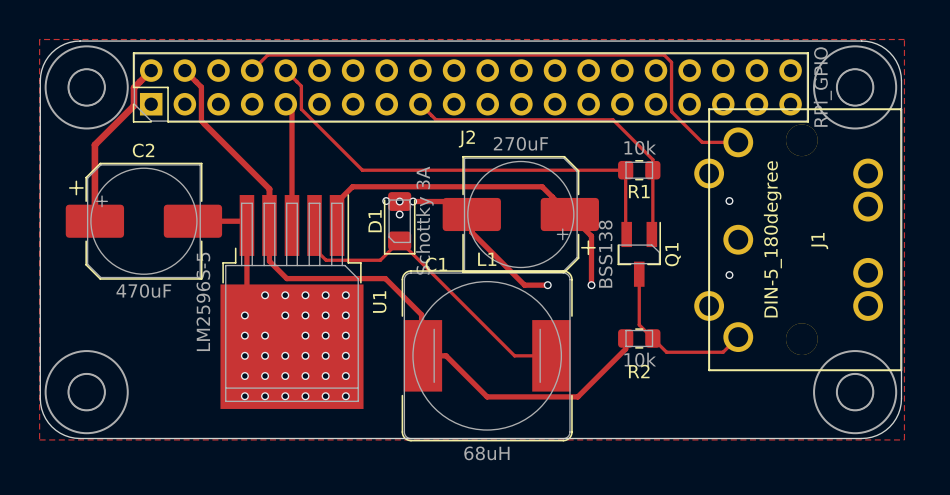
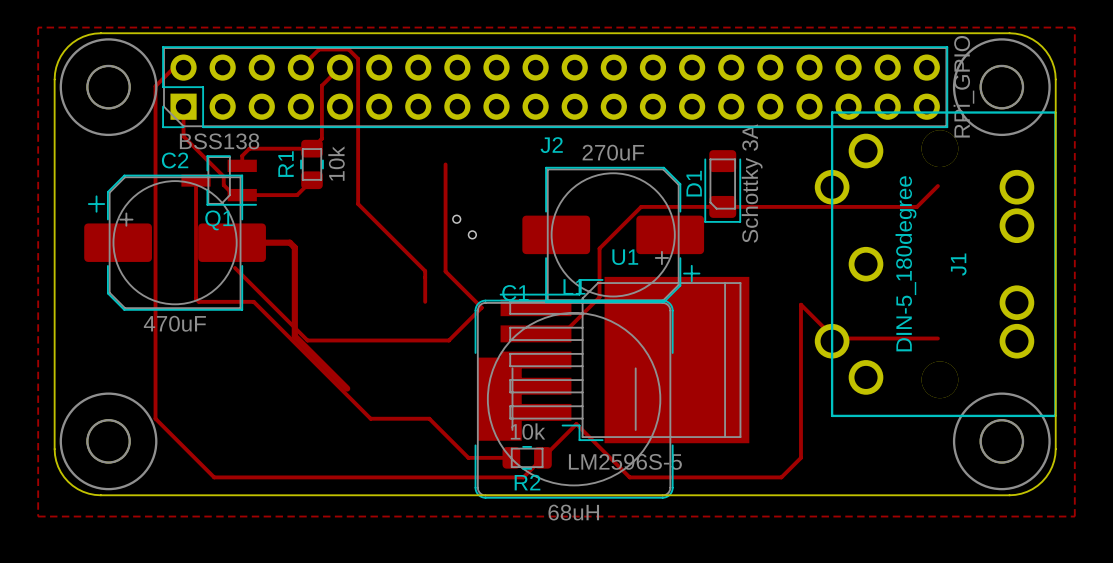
zone outline: (39, 39) (39, 439) (904, 439) (904, 39) (39, 39) -> (38, 27) (38, 516) (1074, 516) (1074, 27) (38, 27)
track: (293, 55) (664, 55) (671, 62) (671, 111) (702, 142) (738, 142) -> none
track: (151, 70) (133, 87) (133, 105) (94, 144) (94, 221) -> (183, 67) (174, 67) (155, 86) (155, 418) (214, 477) (523, 477) (542, 457)
track: (184, 70) (201, 87) (201, 121) (269, 189) (269, 261) (286, 278) (385, 278) (421, 314) (421, 355) (446, 355) (487, 396) (577, 396) (625, 349) (625, 338) -> none
track: (285, 70) (301, 86) -> (348, 49) (358, 58) (358, 85)
track: none -> (340, 67) (321, 85) (321, 138) (311, 148) (249, 148) (242, 155) (242, 165)
track: none -> (183, 106) (183, 136) (223, 176) (223, 185) (233, 195) (297, 195) (311, 180)
track: (285, 104) (291, 110) (291, 225) -> none
track: (420, 104) (435, 119) (613, 119) (652, 159) (651, 234) -> none
track: (301, 109) (362, 170) (625, 170) (626, 234) -> (358, 112) (358, 204) (425, 271) (425, 301)
track: none -> (445, 164) (445, 271) (481, 307) (448, 340) (307, 340) (234, 267)
track: none -> (196, 180) (196, 299) (198, 301) (253, 301) (370, 418) (429, 418) (468, 457) (511, 457)
R1 rotation: 0° (639, 170) -> 90° clockwise (311, 164)
R1 position: (639, 170) -> (311, 164)
track: none -> (937, 186) (917, 206) (641, 206) (599, 248) (599, 297) (562, 333) (536, 333)
track: (399, 201) (458, 201) (471, 214) (471, 232) (524, 285) (547, 285) -> none
via: (399, 201) -> none
via: (413, 201) -> none
via: (729, 201) -> none
D1 position: (399, 223) -> (722, 186)
track: (314, 225) (314, 248) (326, 260) (380, 260) (399, 240) (514, 355) (552, 355) -> none
track: (337, 225) (337, 202) (352, 186) (542, 186) (591, 236) (591, 285) -> none
Q1 rotation: 0° (639, 254) -> 90° clockwise (219, 180)
Q1 position: (639, 254) -> (219, 180)
track: (639, 274) (639, 324) (666, 352) (723, 352) (738, 337) -> none
via: (729, 275) -> none
via: (547, 285) -> none
via: (591, 285) -> none
via: (265, 295) -> none
via: (285, 295) -> none
via: (305, 295) -> none
via: (325, 295) -> none
via: (345, 295) -> none
U1 rotation: 0° (291, 301) -> 90° counterclockwise (624, 360)
U1 position: (291, 301) -> (624, 360)
track: none -> (937, 338) (834, 338) (800, 304) (800, 457) (781, 477) (629, 477) (576, 424) (542, 457)
via: (244, 315) -> none
via: (285, 315) -> none
via: (305, 315) -> none
via: (325, 315) -> none
via: (345, 315) -> none
via: (244, 335) -> none
via: (265, 335) -> none
via: (305, 335) -> none
via: (325, 335) -> none
via: (345, 335) -> none
R2 position: (639, 338) -> (527, 457)
via: (244, 355) -> none
via: (265, 355) -> none
via: (285, 355) -> none
via: (305, 355) -> none
via: (325, 355) -> none
via: (345, 355) -> none
R2 value position: 10k (640, 359) -> 10k (528, 431)
R2 name position: R2 (639, 371) -> R2 (527, 482)
via: (244, 376) -> none
via: (265, 376) -> none
via: (285, 376) -> none
via: (305, 376) -> none
via: (325, 376) -> none
via: (345, 376) -> none
via: (244, 396) -> none
via: (265, 396) -> none
via: (285, 396) -> none
via: (305, 396) -> none
via: (325, 396) -> none
via: (345, 396) -> none

